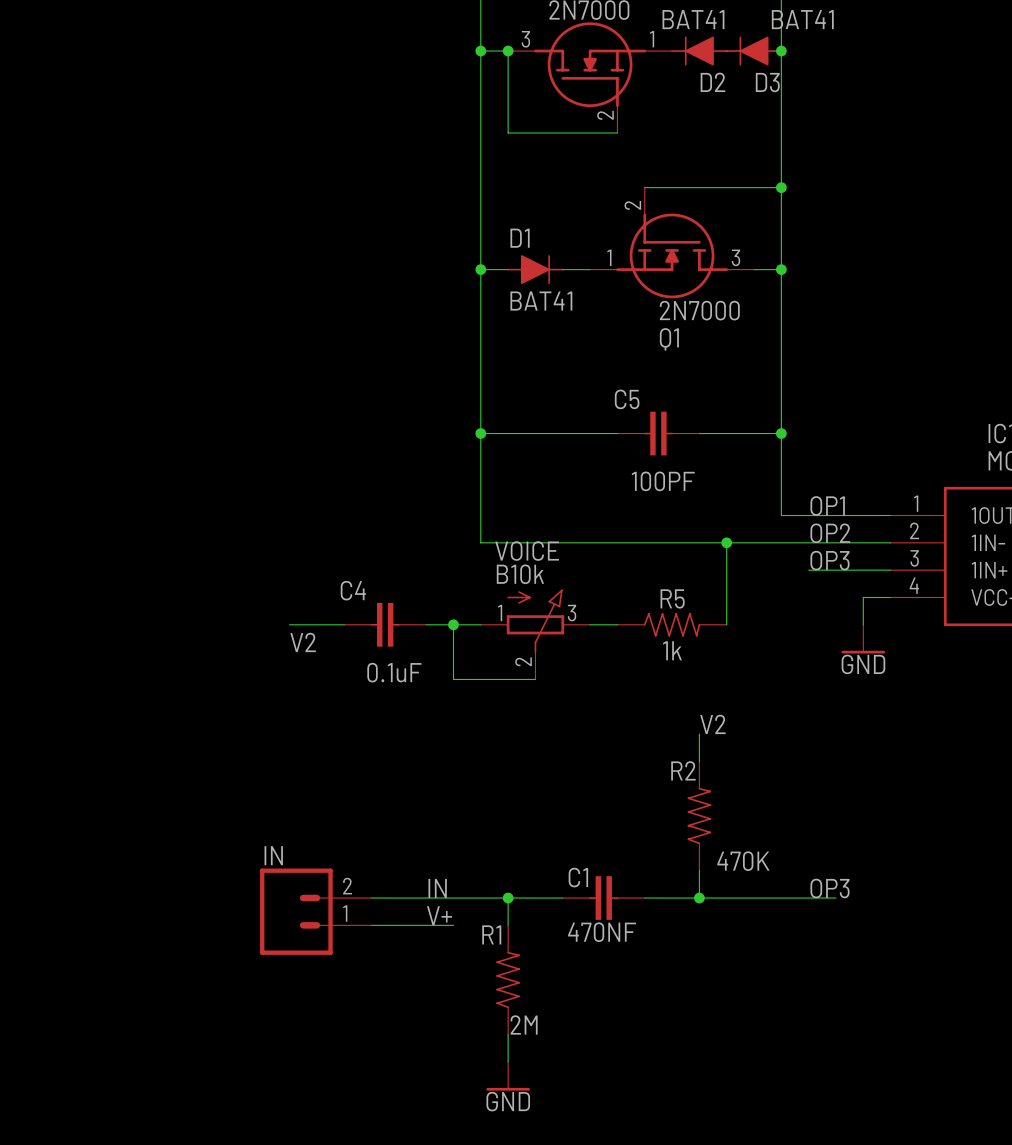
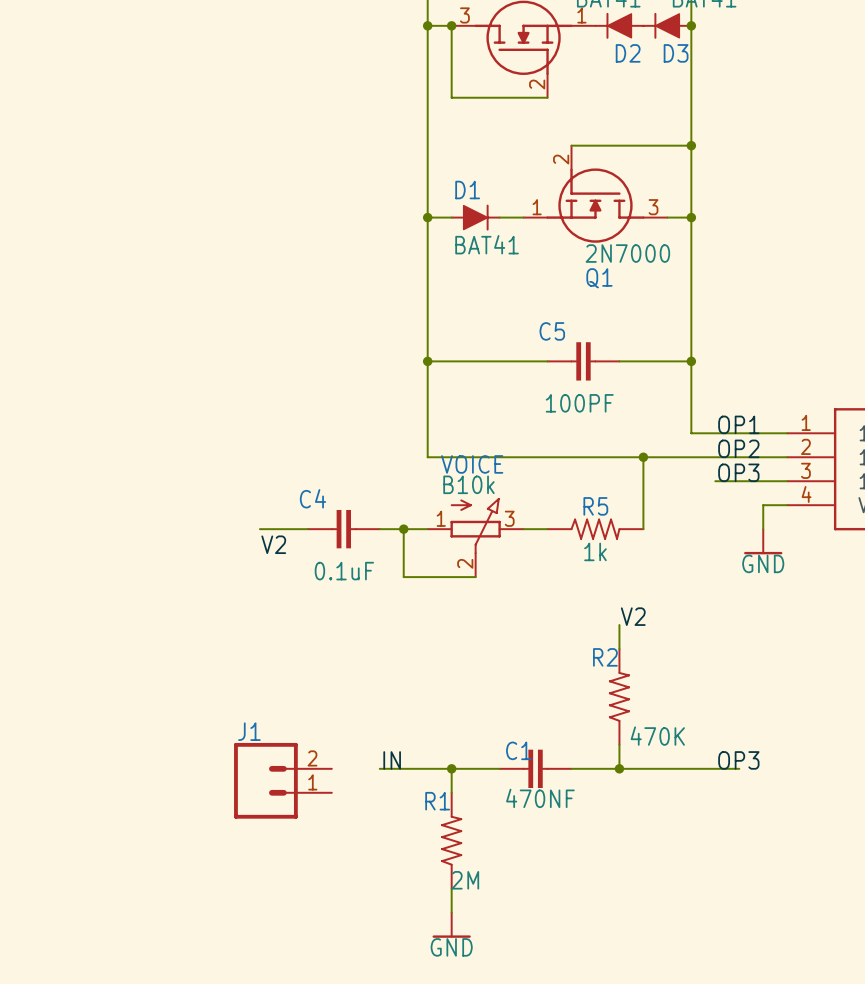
IN name: IN (273, 855) -> J1 (249, 731)
wire: (371, 898) (426, 898) -> none
label: V+ (439, 915) -> none
wire: (371, 925) (453, 925) -> none

